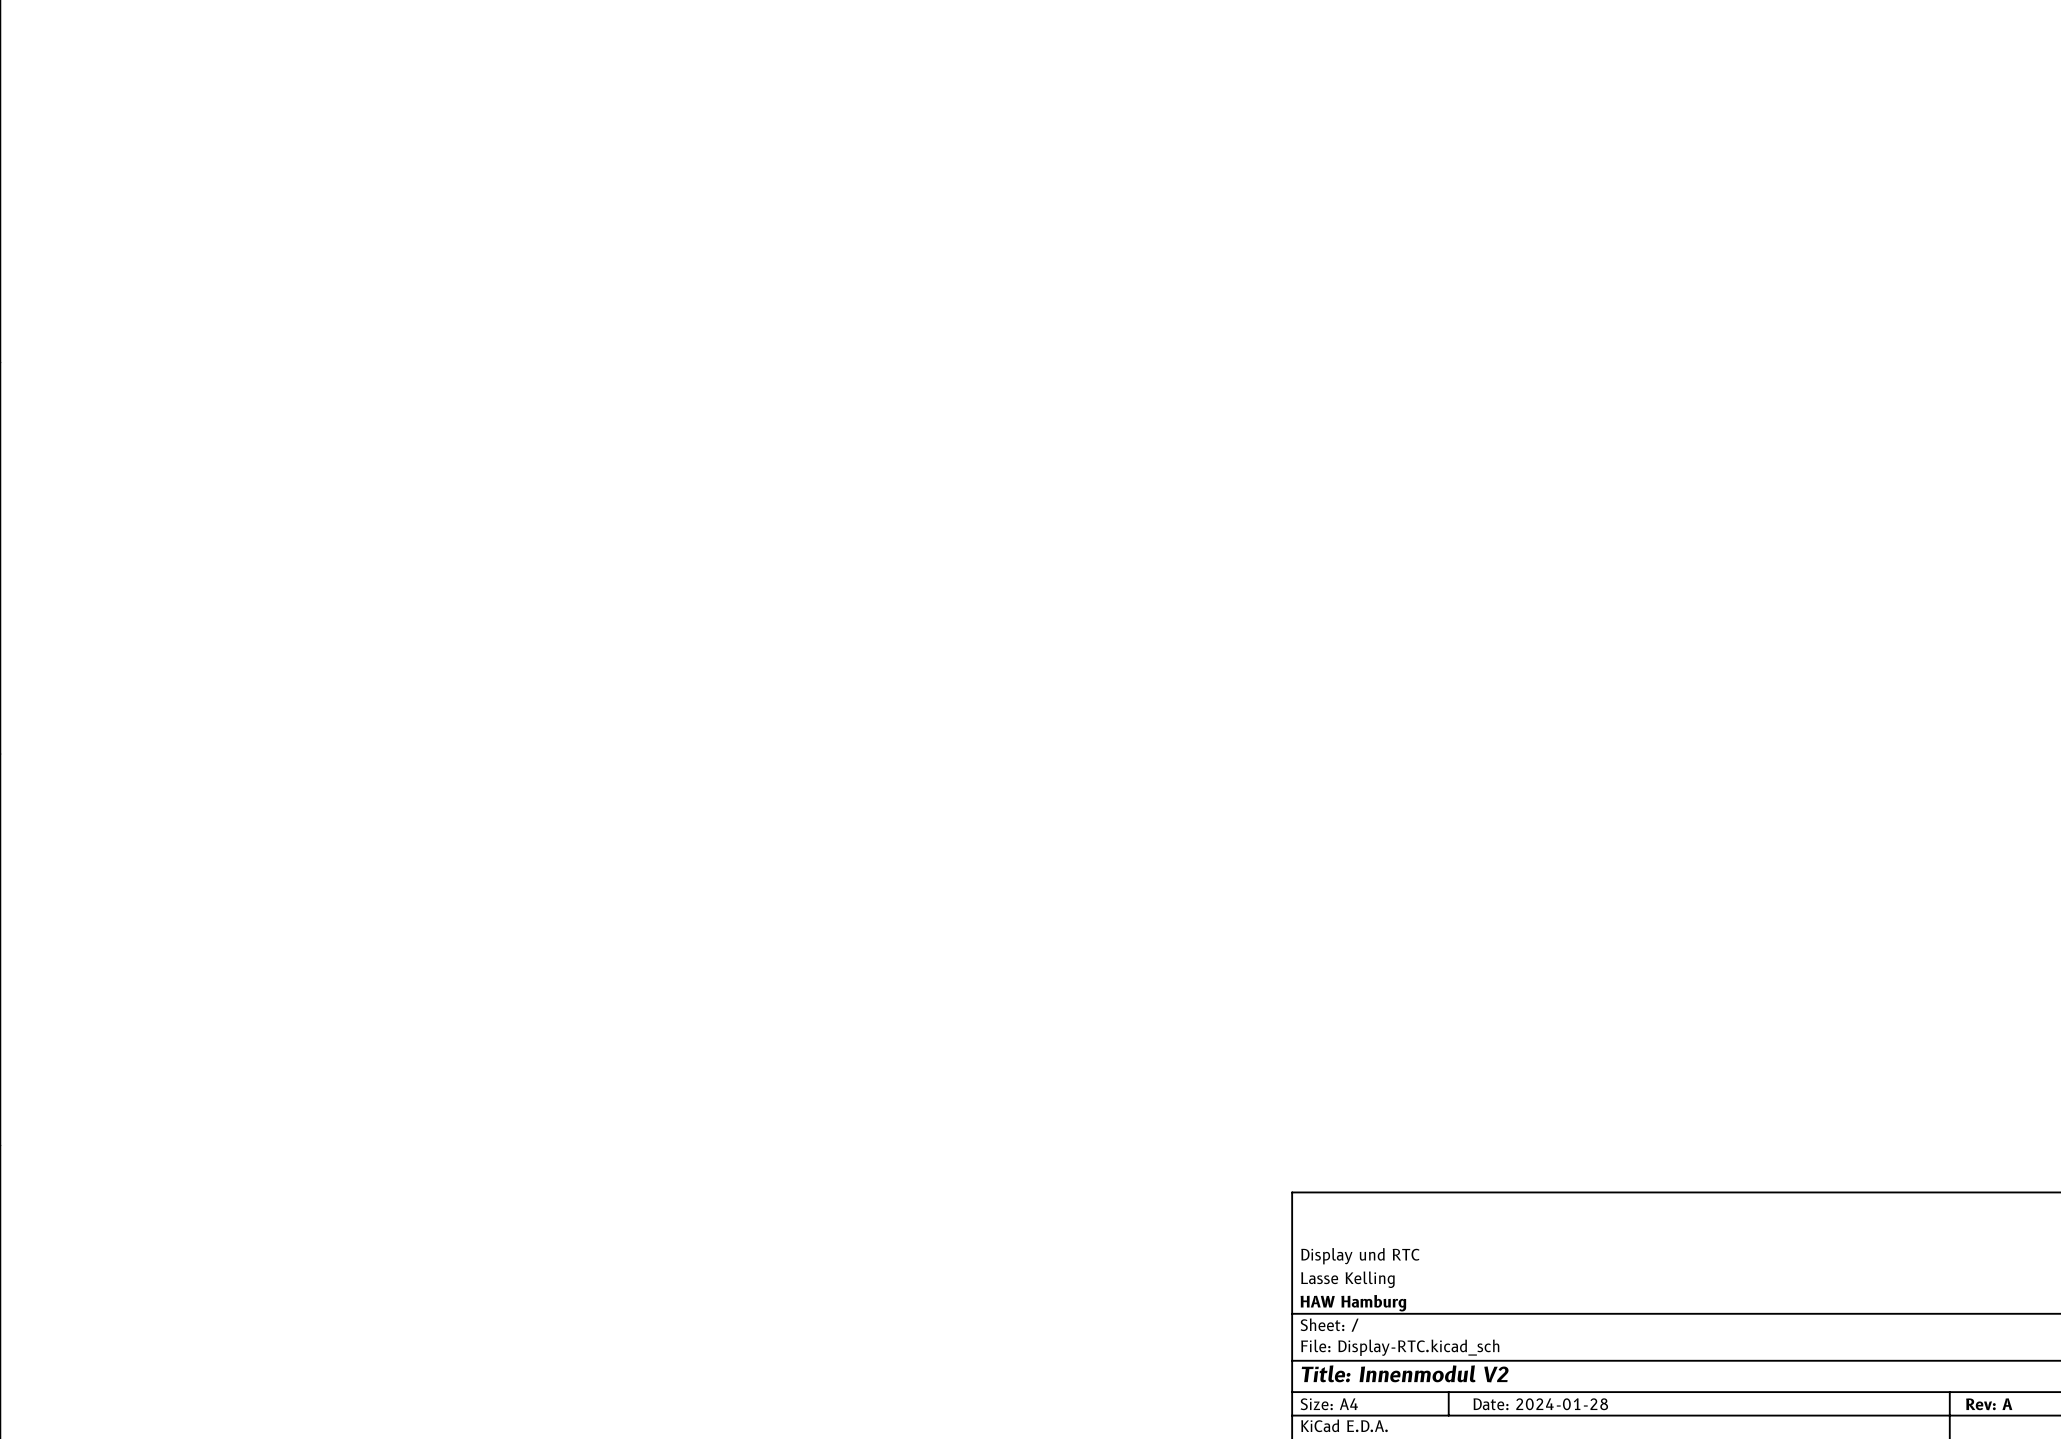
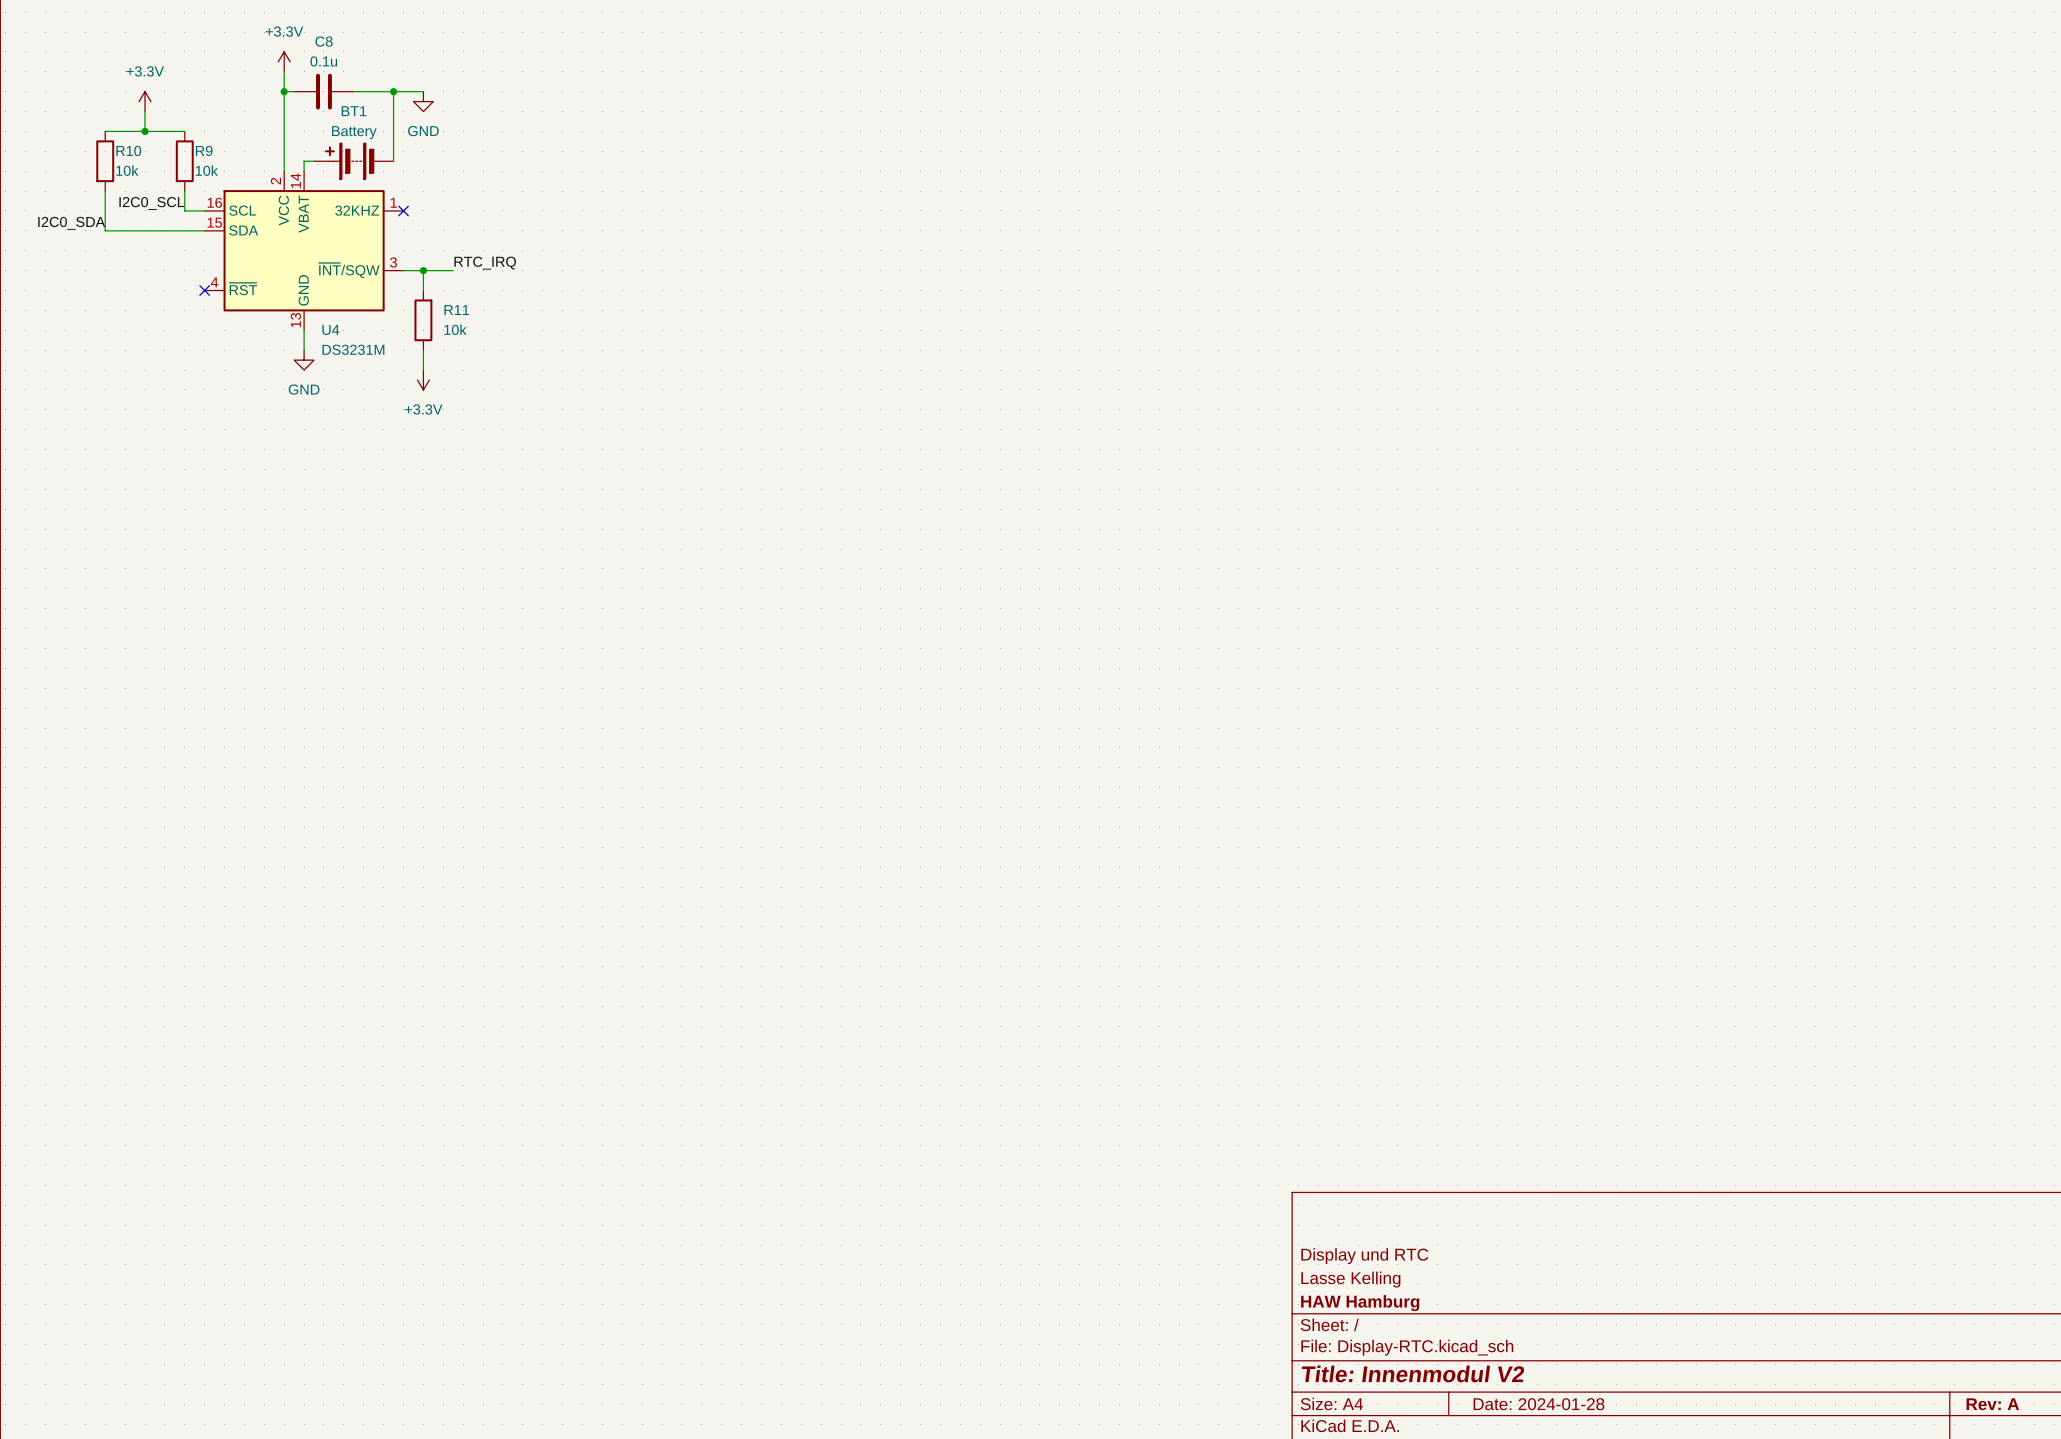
power symbol: none -> +3.3V (284, 61)
wire: none -> (284, 71) (284, 171)
wire: none -> (284, 91) (294, 91)
junction: none -> (284, 91)
C8: none -> 0.1u (323, 91)
wire: none -> (353, 91) (423, 91)
wire: none -> (393, 91) (393, 161)
junction: none -> (393, 91)
power symbol: none -> +3.3V (145, 101)
power symbol: none -> GND (423, 101)
wire: none -> (145, 111) (145, 131)
wire: none -> (105, 131) (184, 131)
junction: none -> (145, 131)
R10: none -> 10k (105, 161)
R9: none -> 10k (184, 161)
wire: none -> (314, 161) (304, 161) (304, 171)
BT1: none -> Battery (353, 161)
wire: none -> (105, 191) (105, 230) (204, 230)
wire: none -> (184, 191) (184, 210) (204, 210)
label: none -> I2C0_SCL (151, 203)
no-connect mark: none -> (403, 210)
label: none -> I2C0_SDA (71, 223)
U4: none -> DS3231M (304, 250)
label: none -> RTC_IRQ (485, 263)
wire: none -> (403, 270) (453, 270)
wire: none -> (423, 270) (423, 290)
junction: none -> (423, 270)
no-connect mark: none -> (204, 290)
R11: none -> 10k (423, 320)
wire: none -> (304, 330) (304, 350)
wire: none -> (423, 350) (423, 370)
power symbol: none -> GND (304, 360)
power symbol: none -> +3.3V (423, 380)

